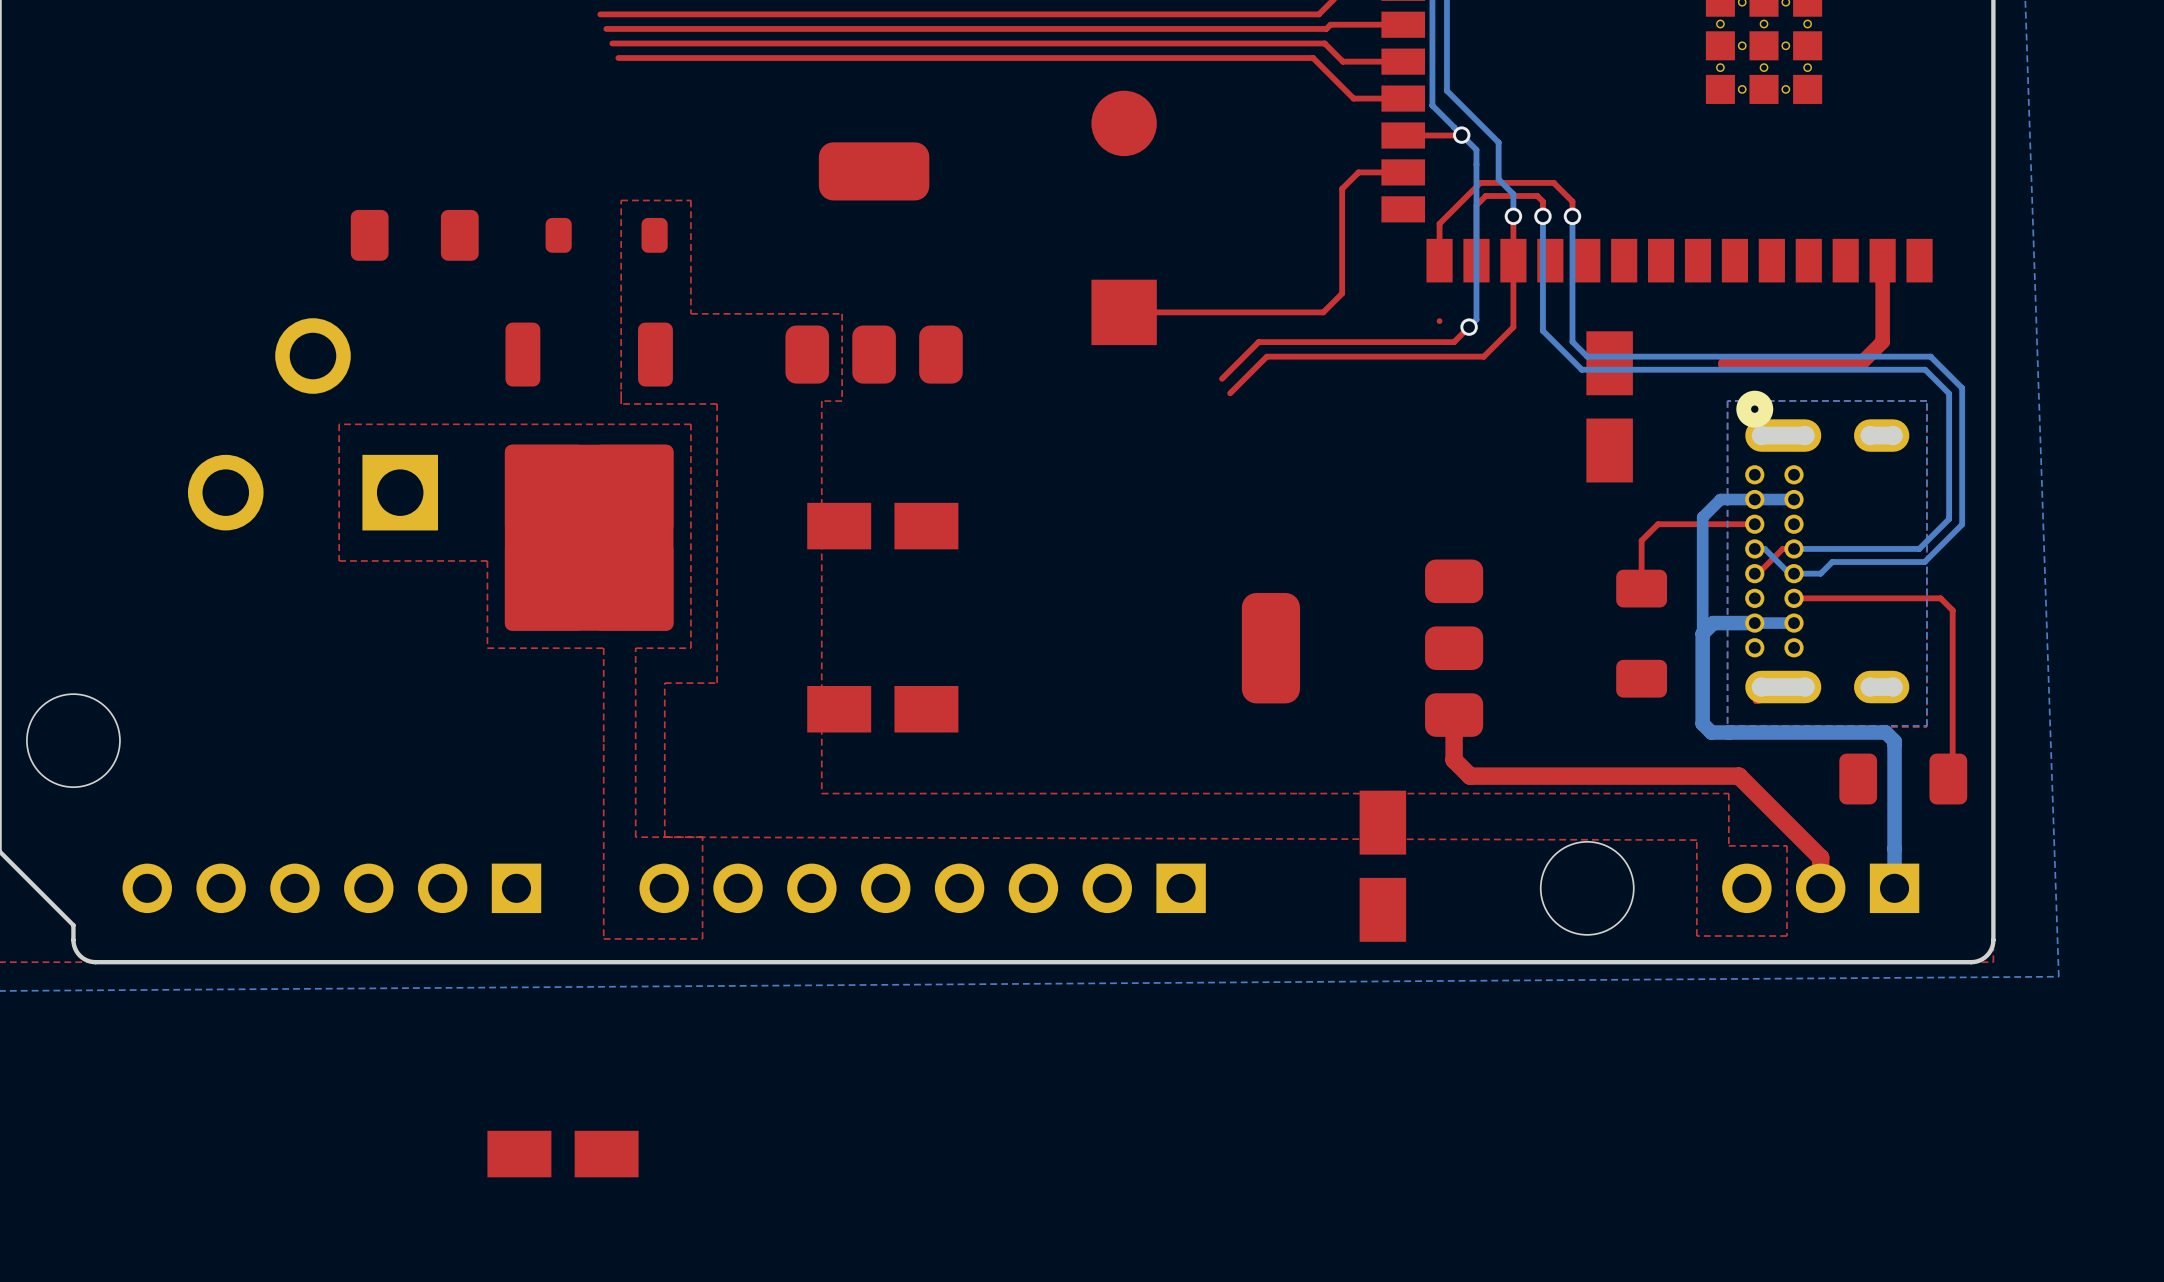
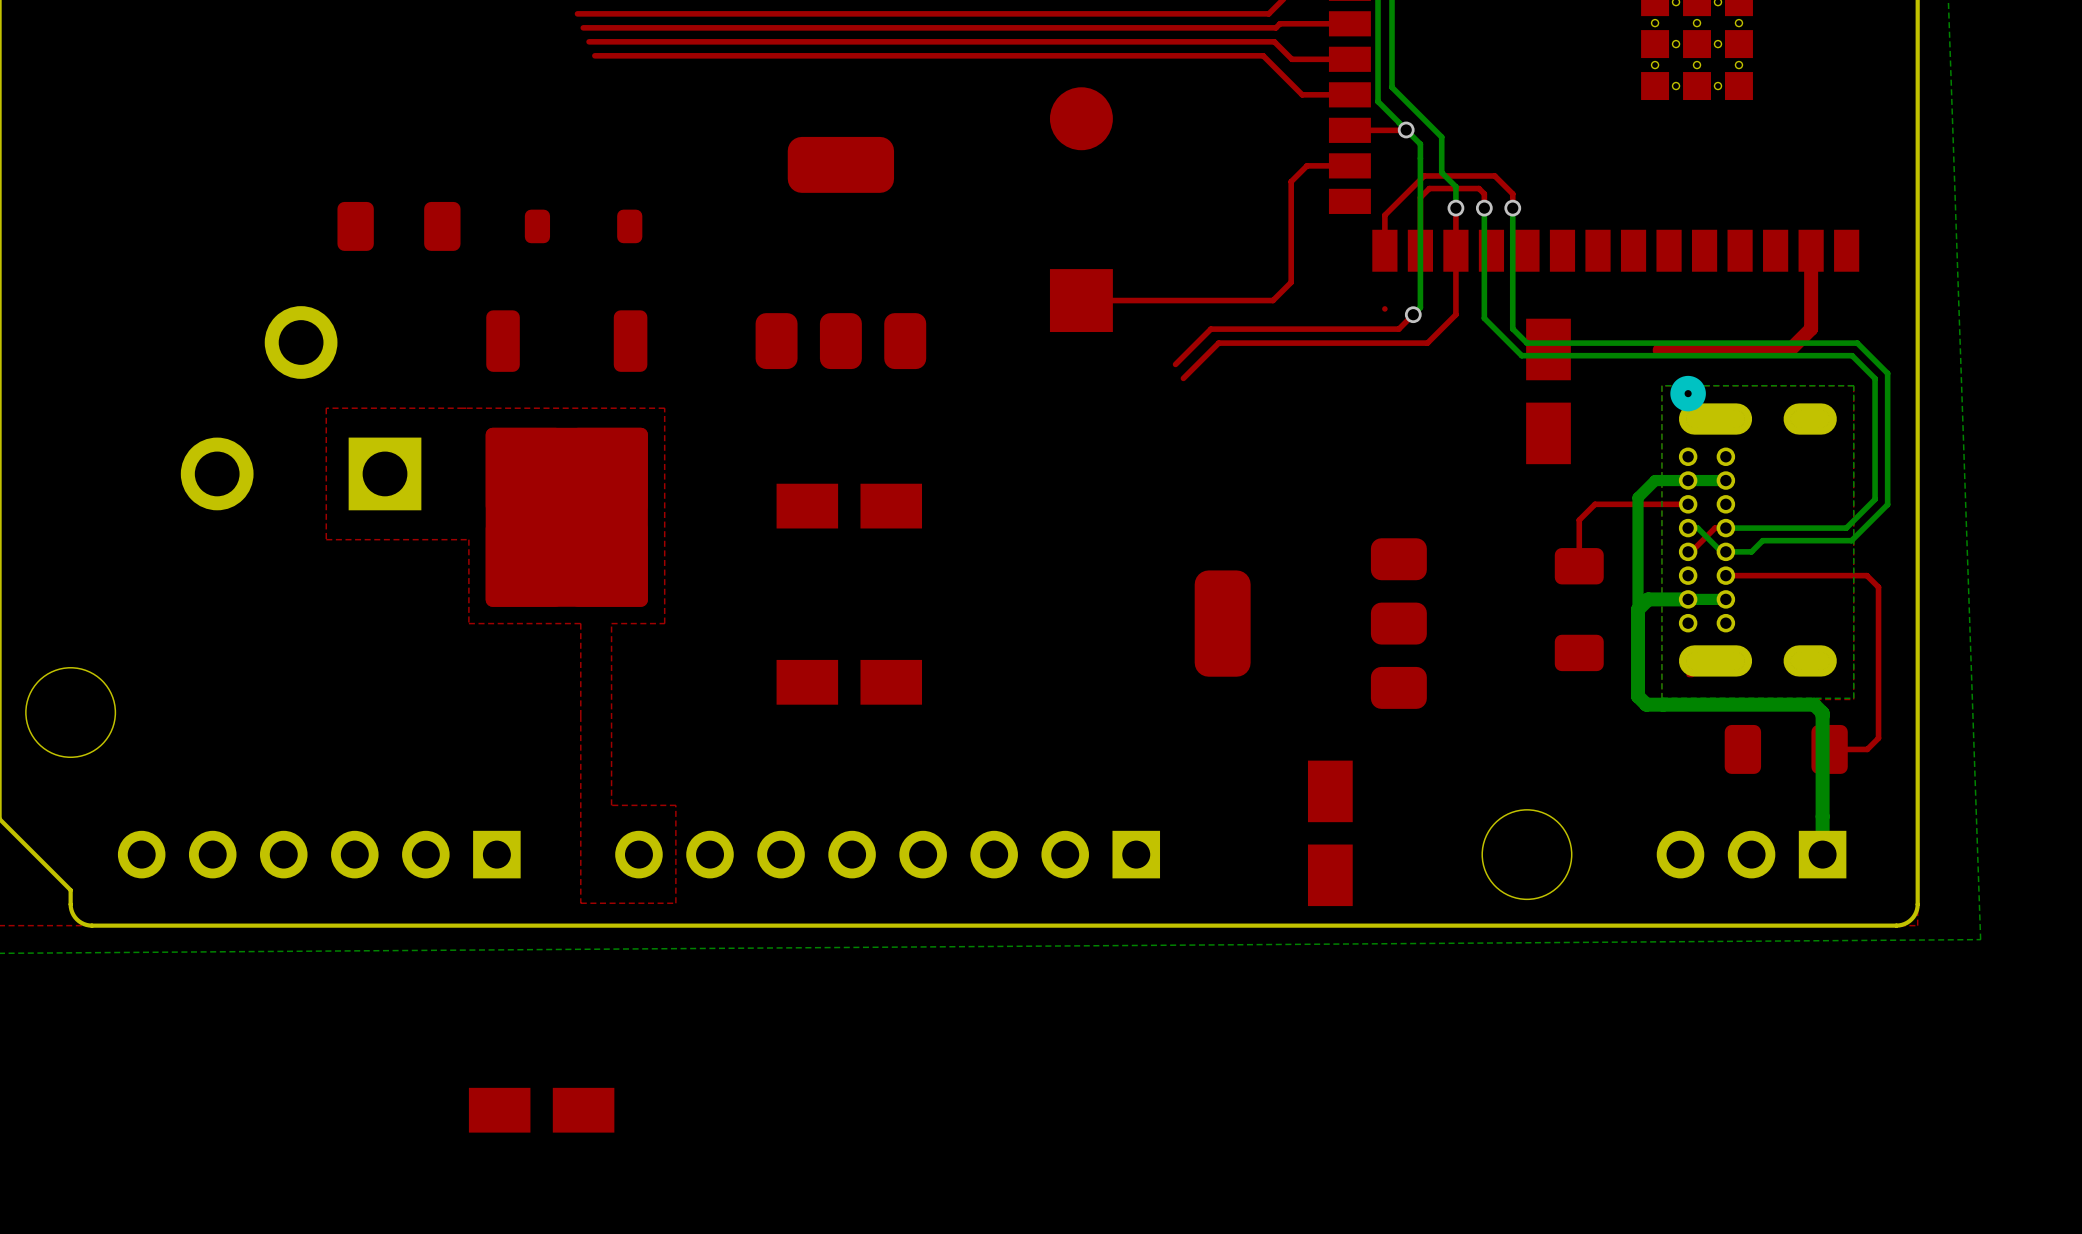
top zone outline: (690, 200) (690, 313) (842, 313) (842, 401) (821, 401) (821, 793) (1728, 793) (1728, 845) (1786, 845) (1786, 936) (1696, 936) (1696, 840) (664, 837) (664, 683) (717, 683) (717, 403) (621, 403) (621, 200) (690, 200) -> none
top track: (1454, 715) (1454, 760) (1470, 776) (1739, 776) (1820, 857) (1820, 888) -> none
top track: none -> (1878, 738) (1867, 749) (1829, 749)
part position: (1903, 779) -> (1786, 749)

